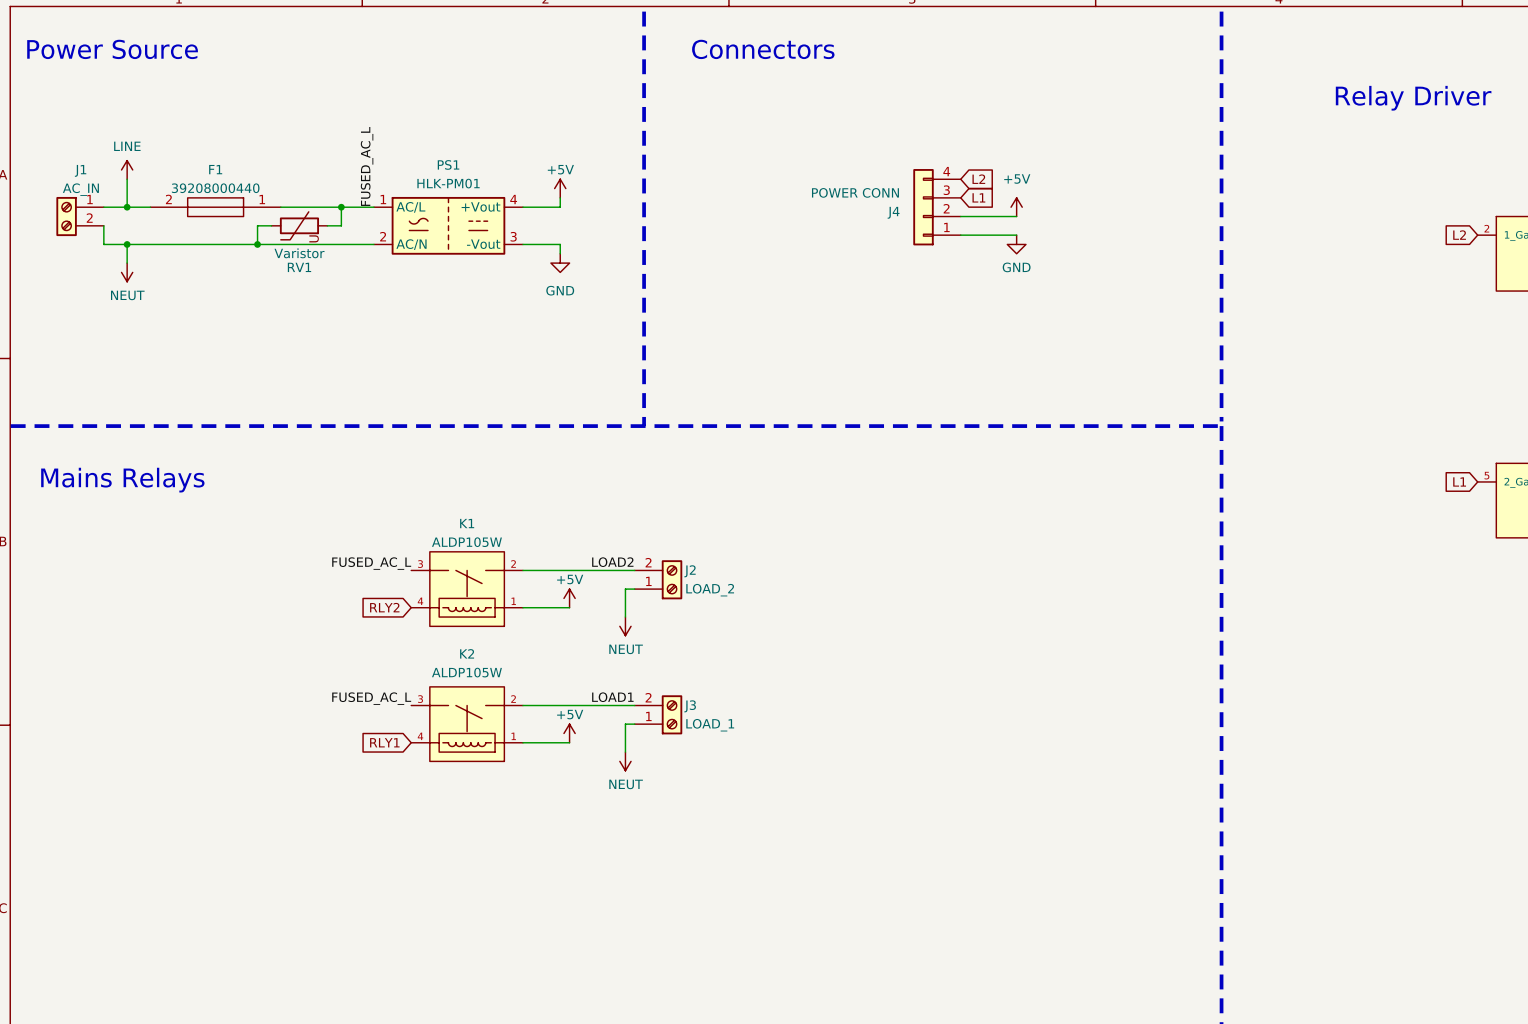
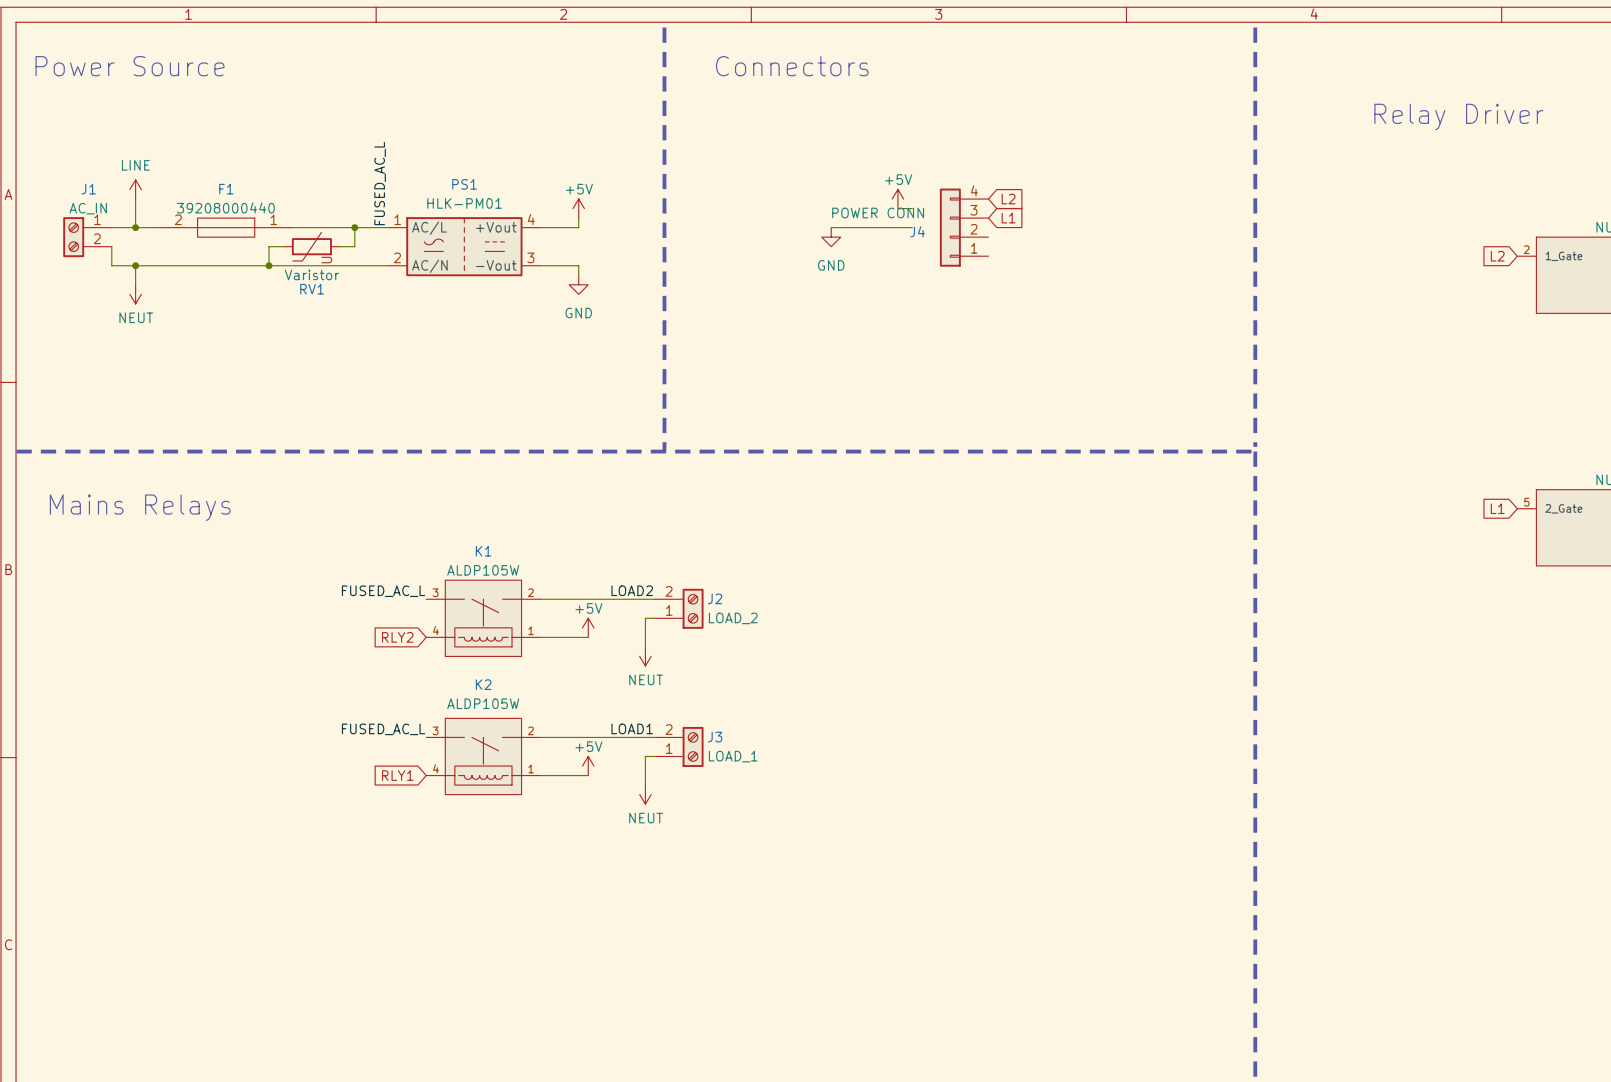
power symbol text position: +5V (1017, 179) -> +5V (898, 179)
wire: none -> (897, 208) (912, 208)
wire: none -> (831, 227) (912, 227)
power symbol position: +5V (1016, 207) -> +5V (897, 199)
power symbol: none -> GND (831, 237)
wire: (960, 216) (1016, 216) -> none
wire: (960, 235) (1016, 235) -> none
power symbol: GND (1016, 244) -> none

